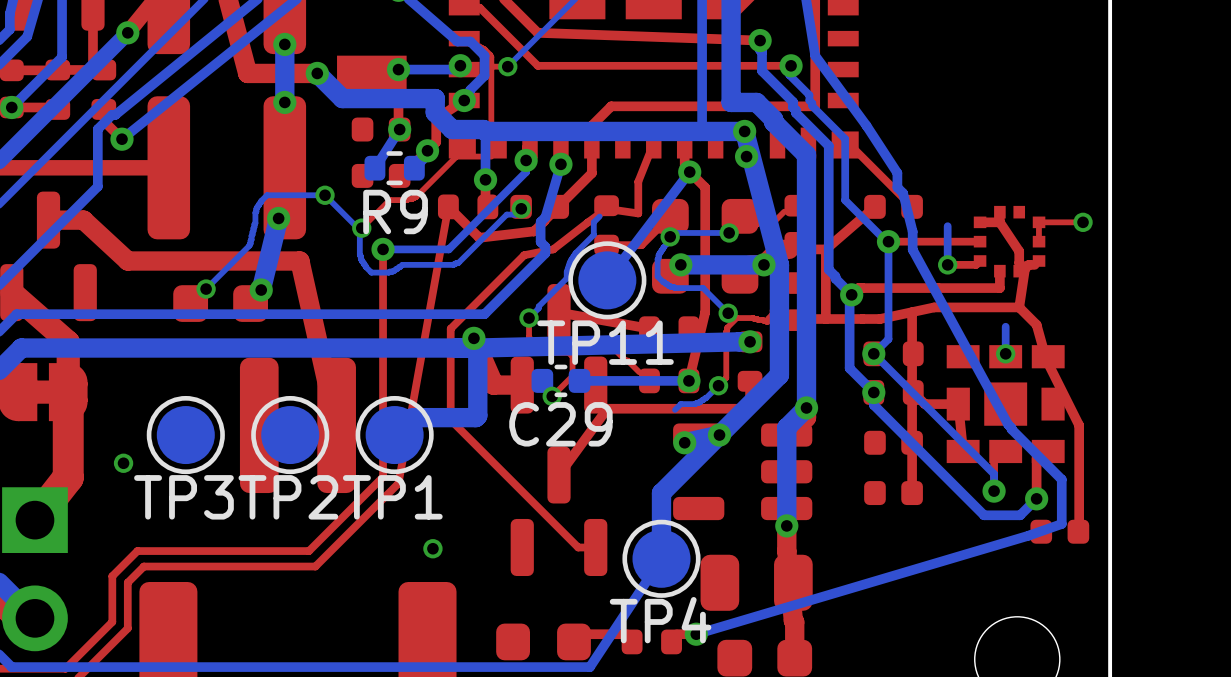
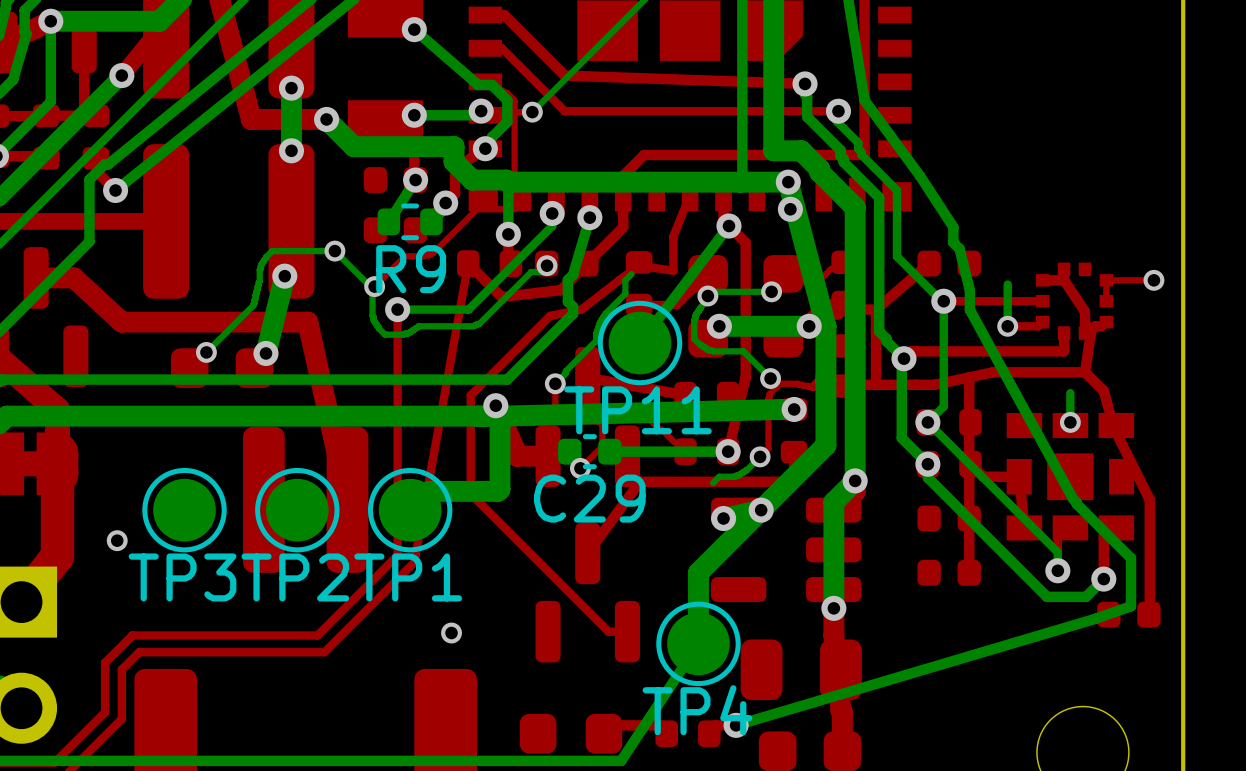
top track: (845, 144) (850, 144) (912, 206) -> none

